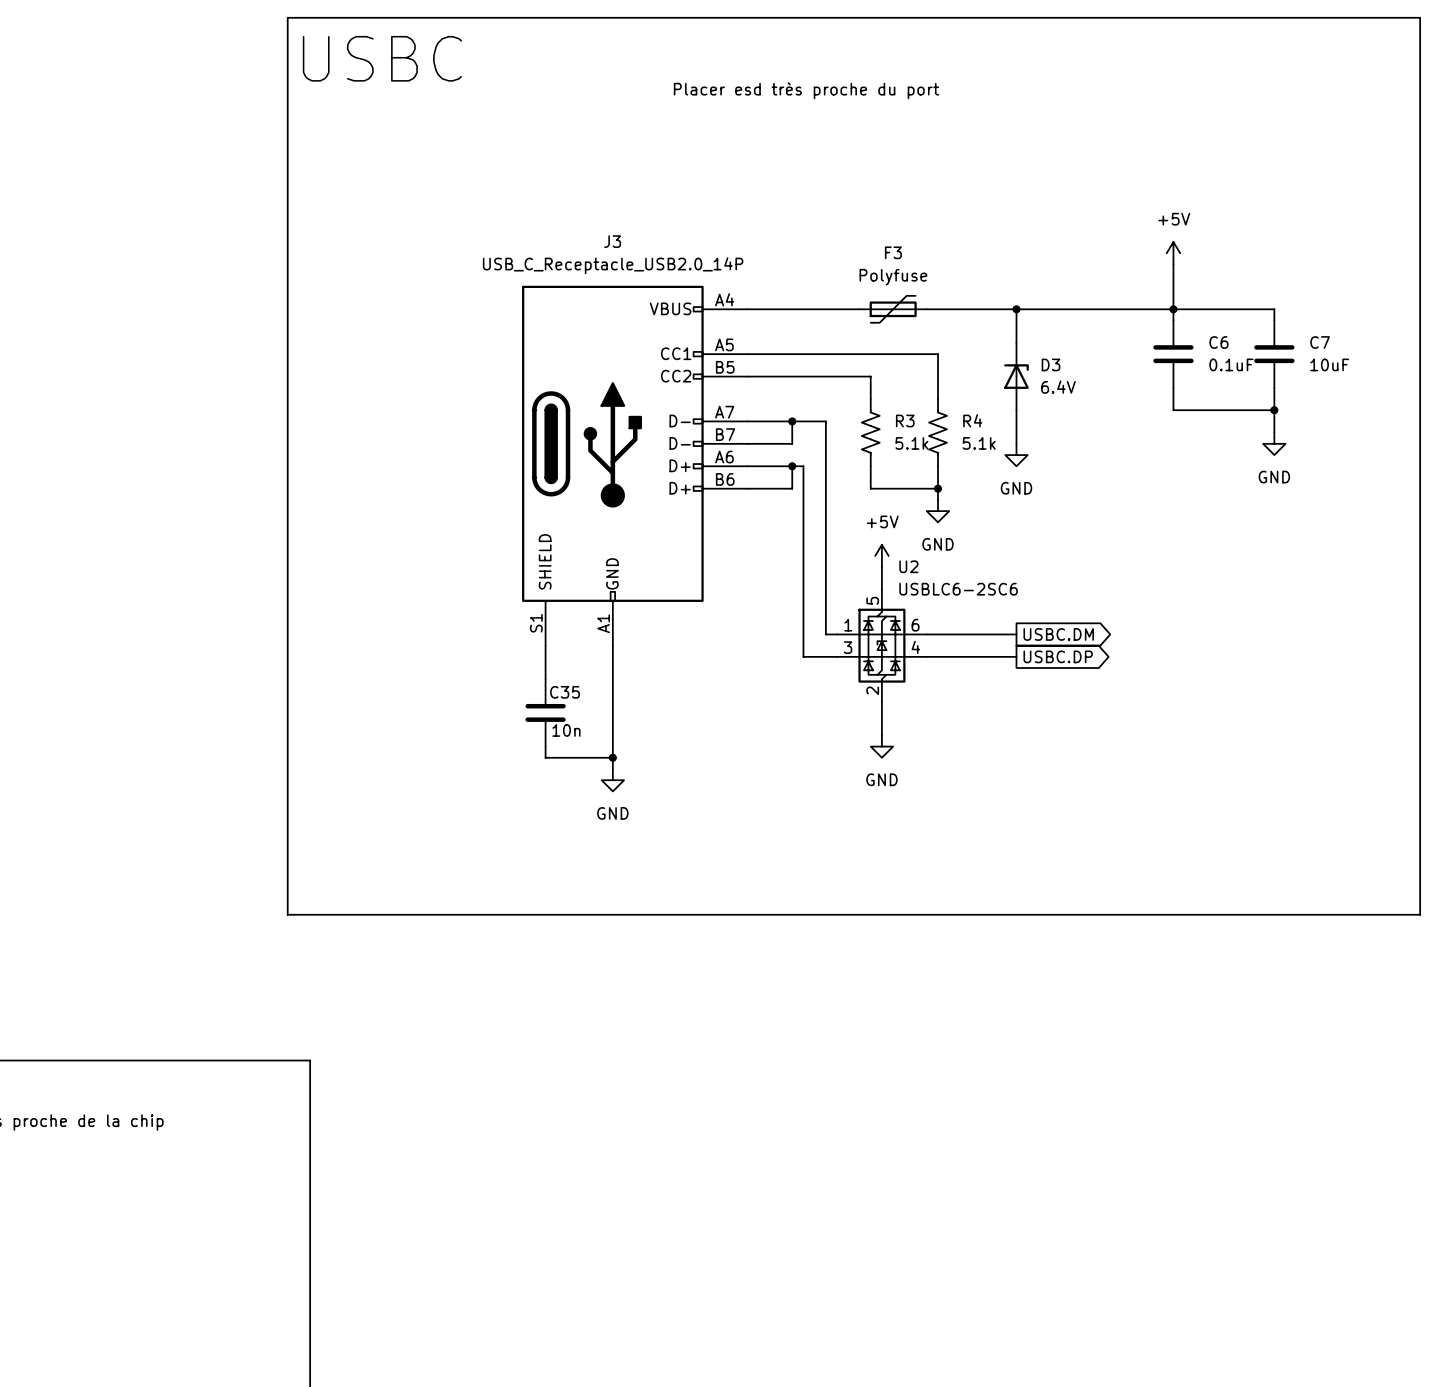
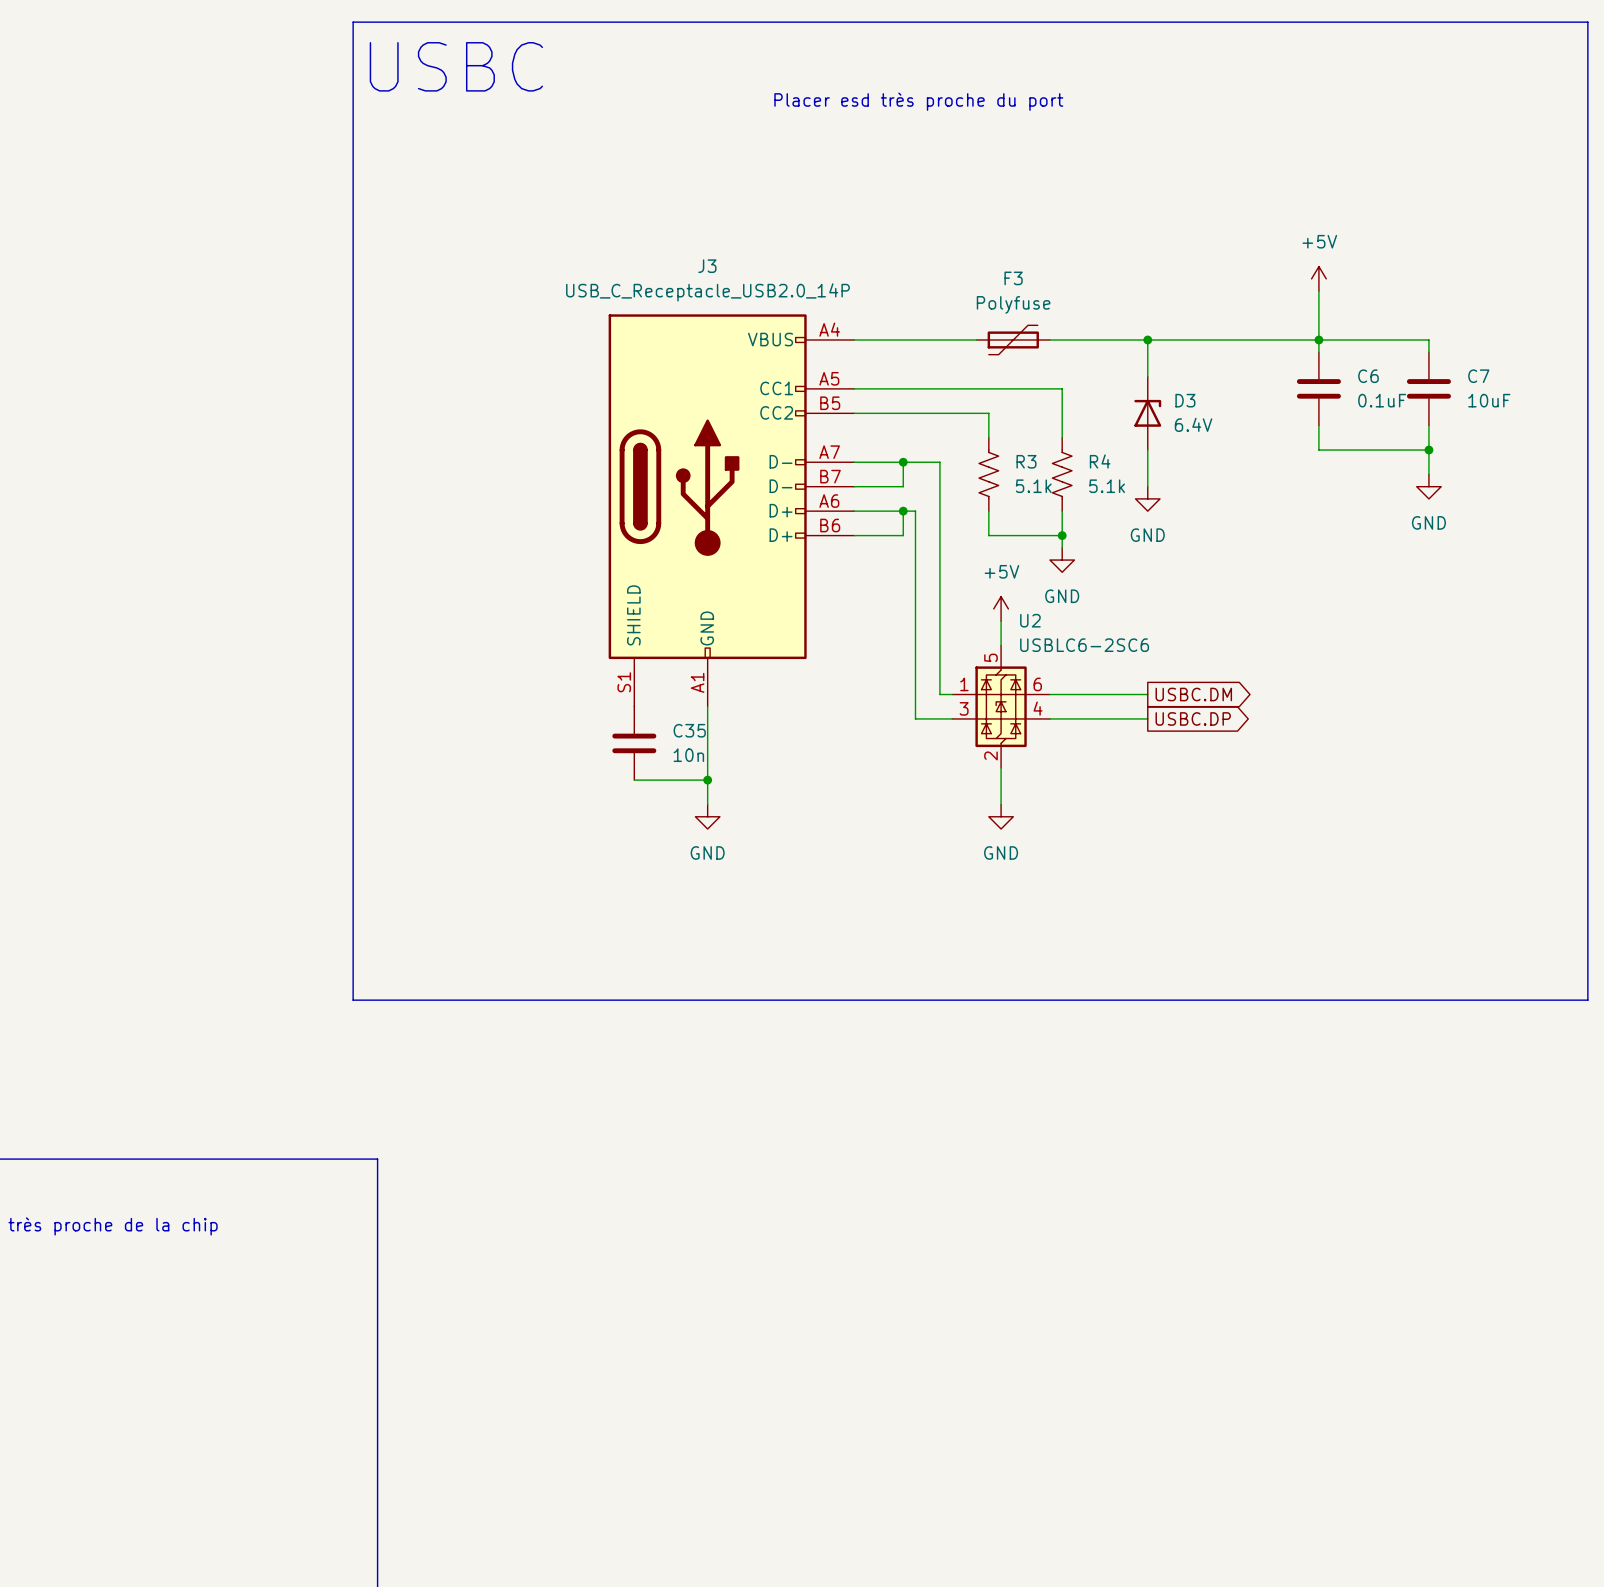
C35 name position: C35 (564, 692) -> C35 (689, 730)
wire: none -> (634, 780) (707, 780)
C35 position: (545, 712) -> (634, 743)
C35 value position: 10n (566, 730) -> 10n (688, 755)
wire: (612, 735) (612, 769) -> none
wire: (545, 746) (545, 757) (612, 757) -> none
junction position: (612, 757) -> (707, 780)
power symbol position: GND (612, 780) -> GND (707, 816)

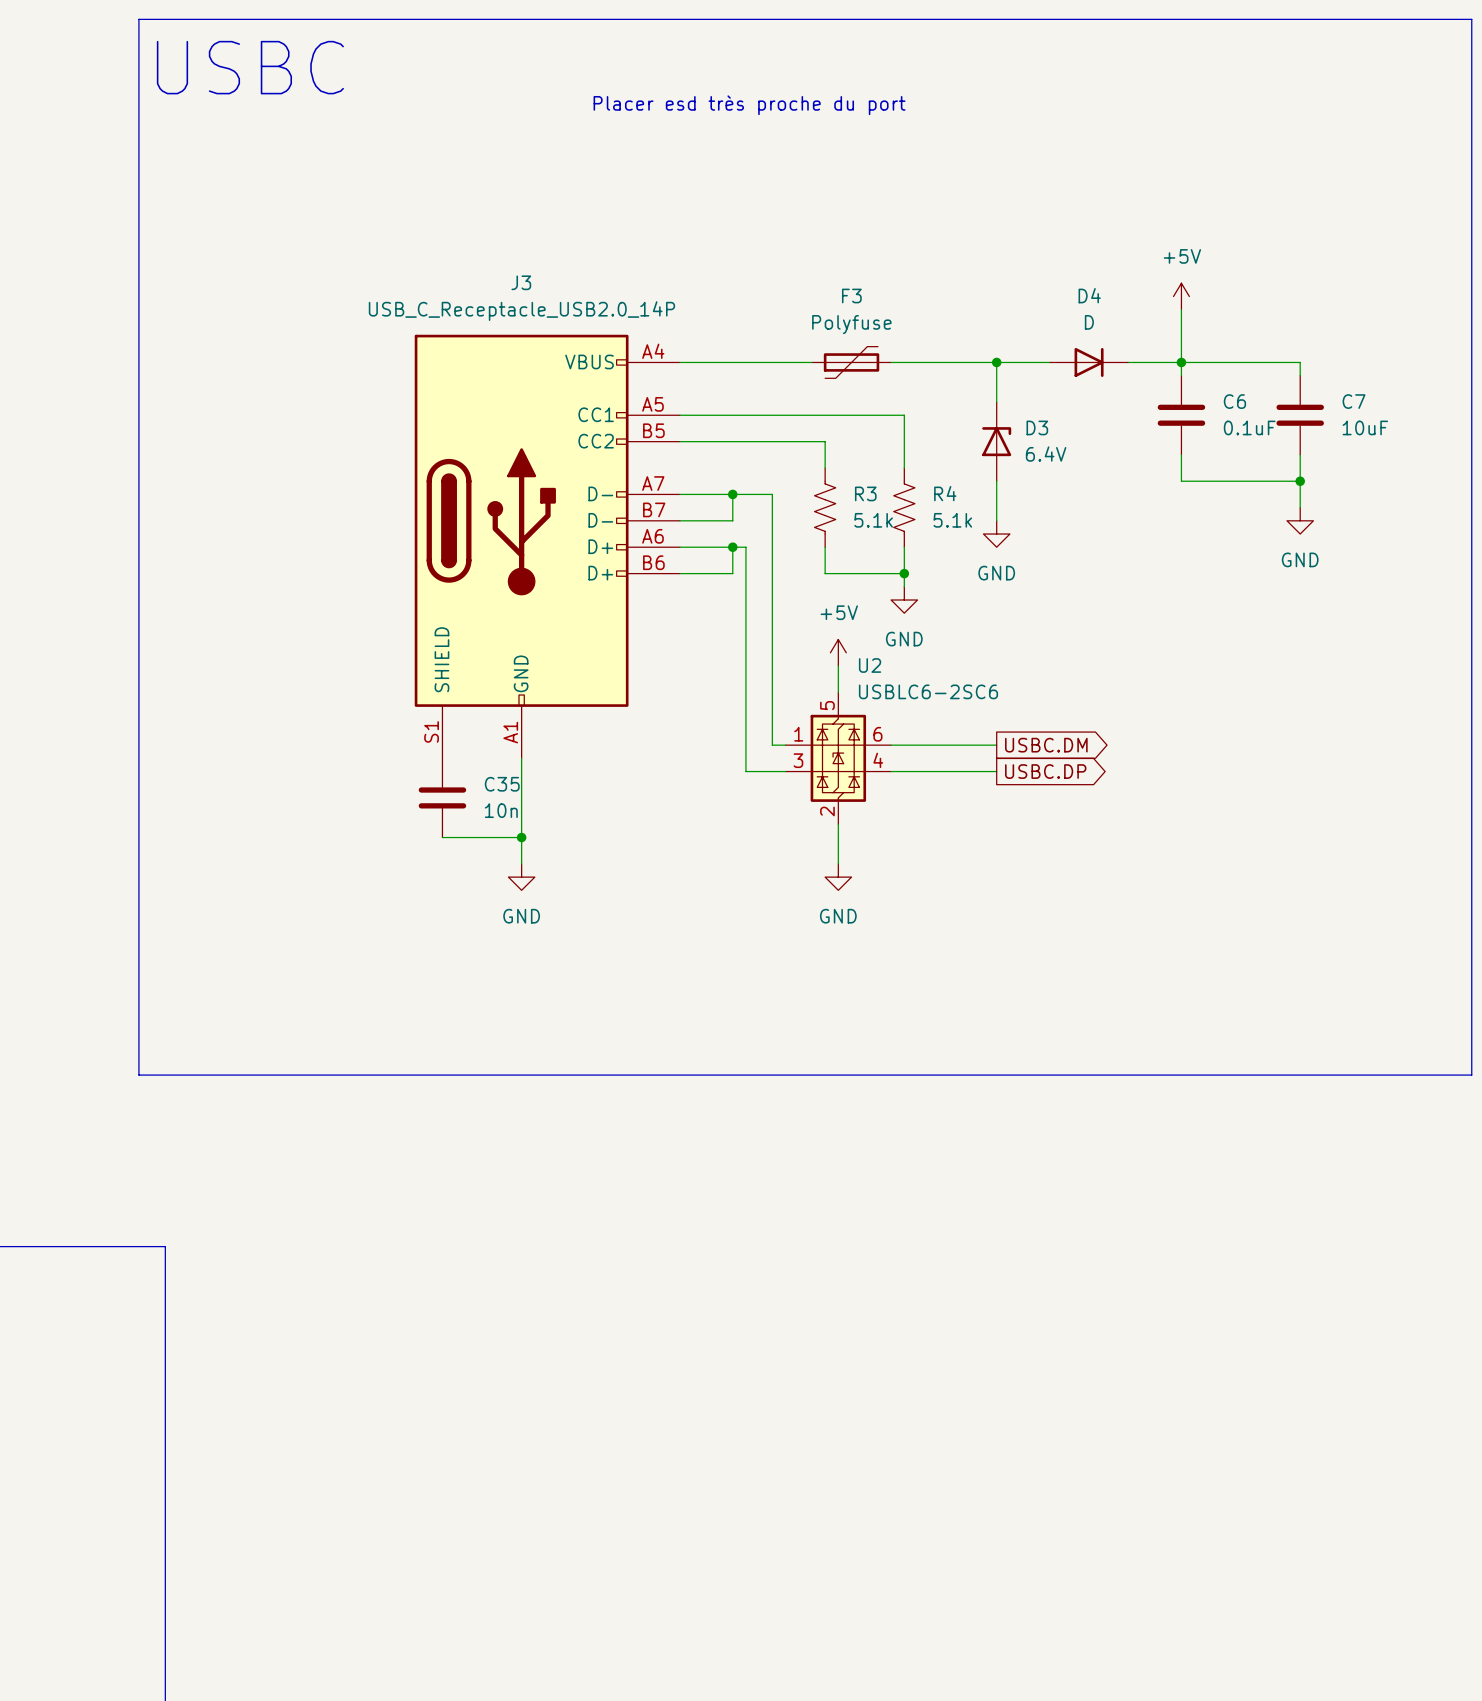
D4: none -> D (1089, 362)

